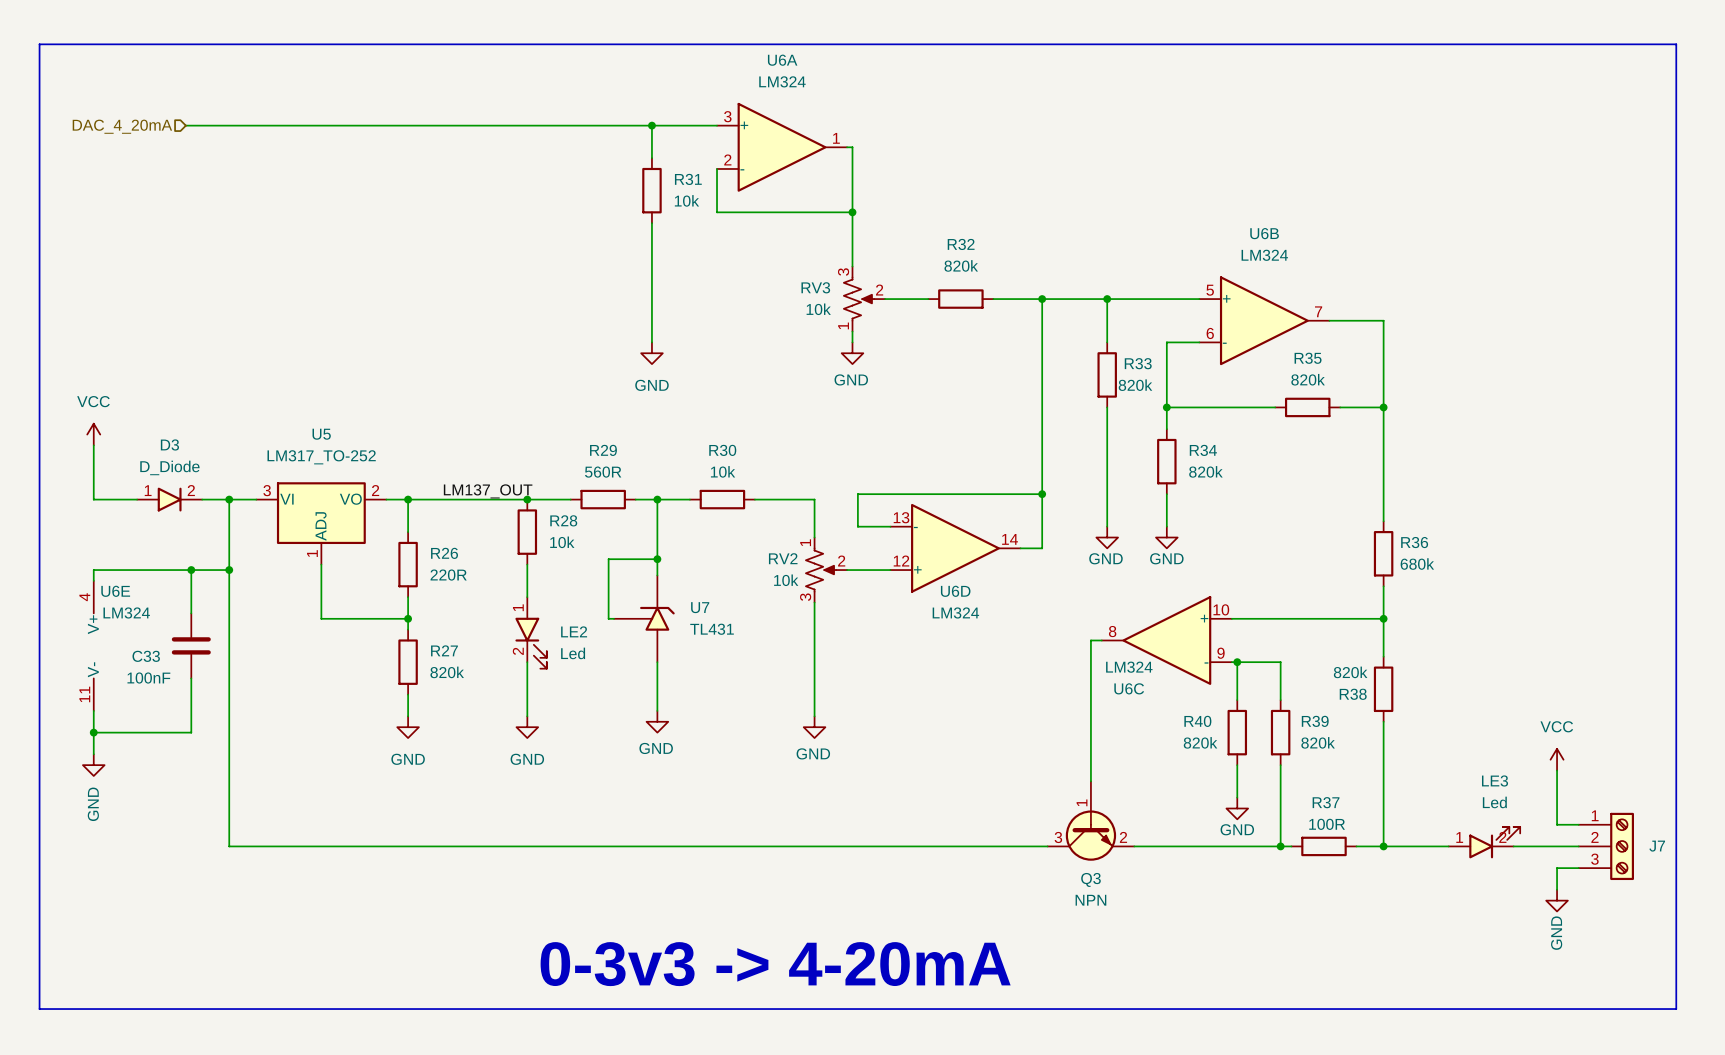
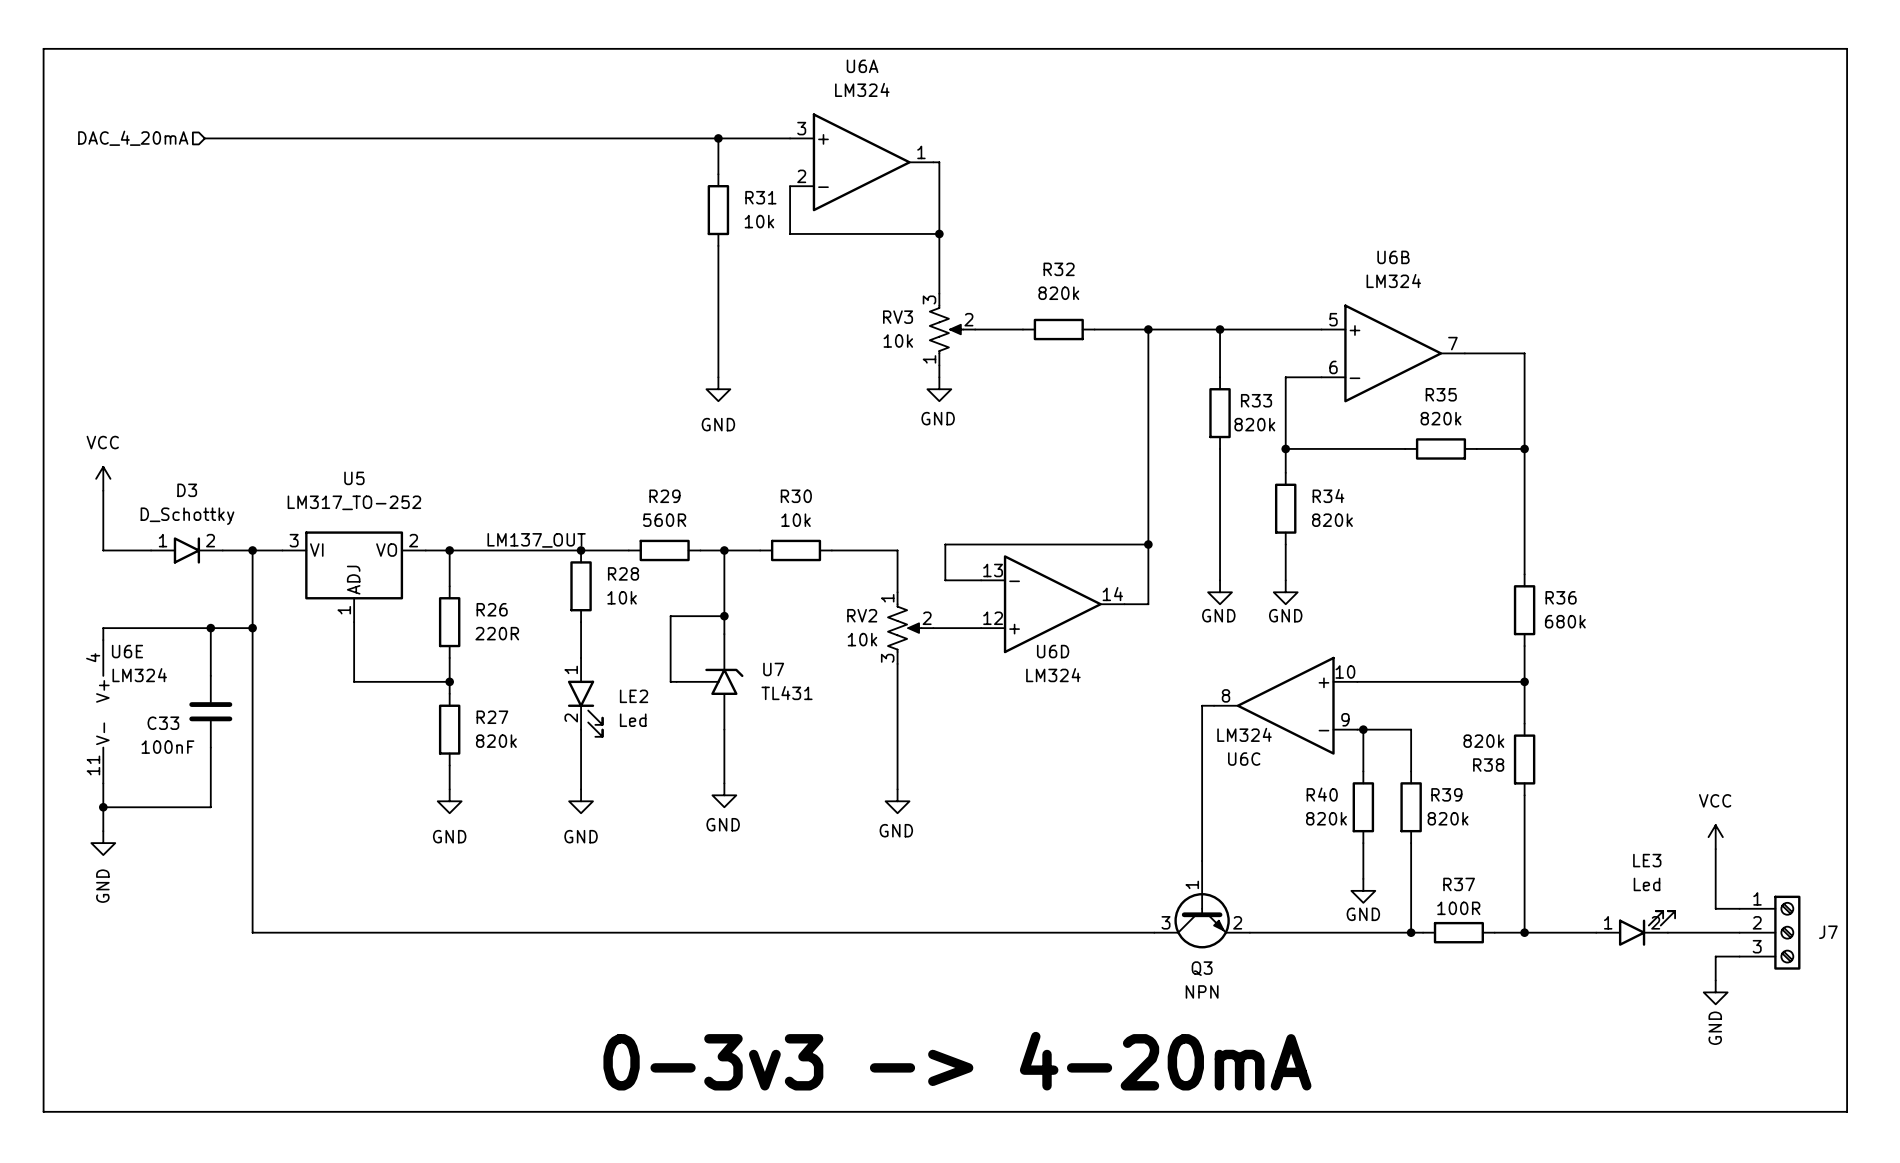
D3 value: D_Diode (169, 467) -> D_Schottky (187, 516)

